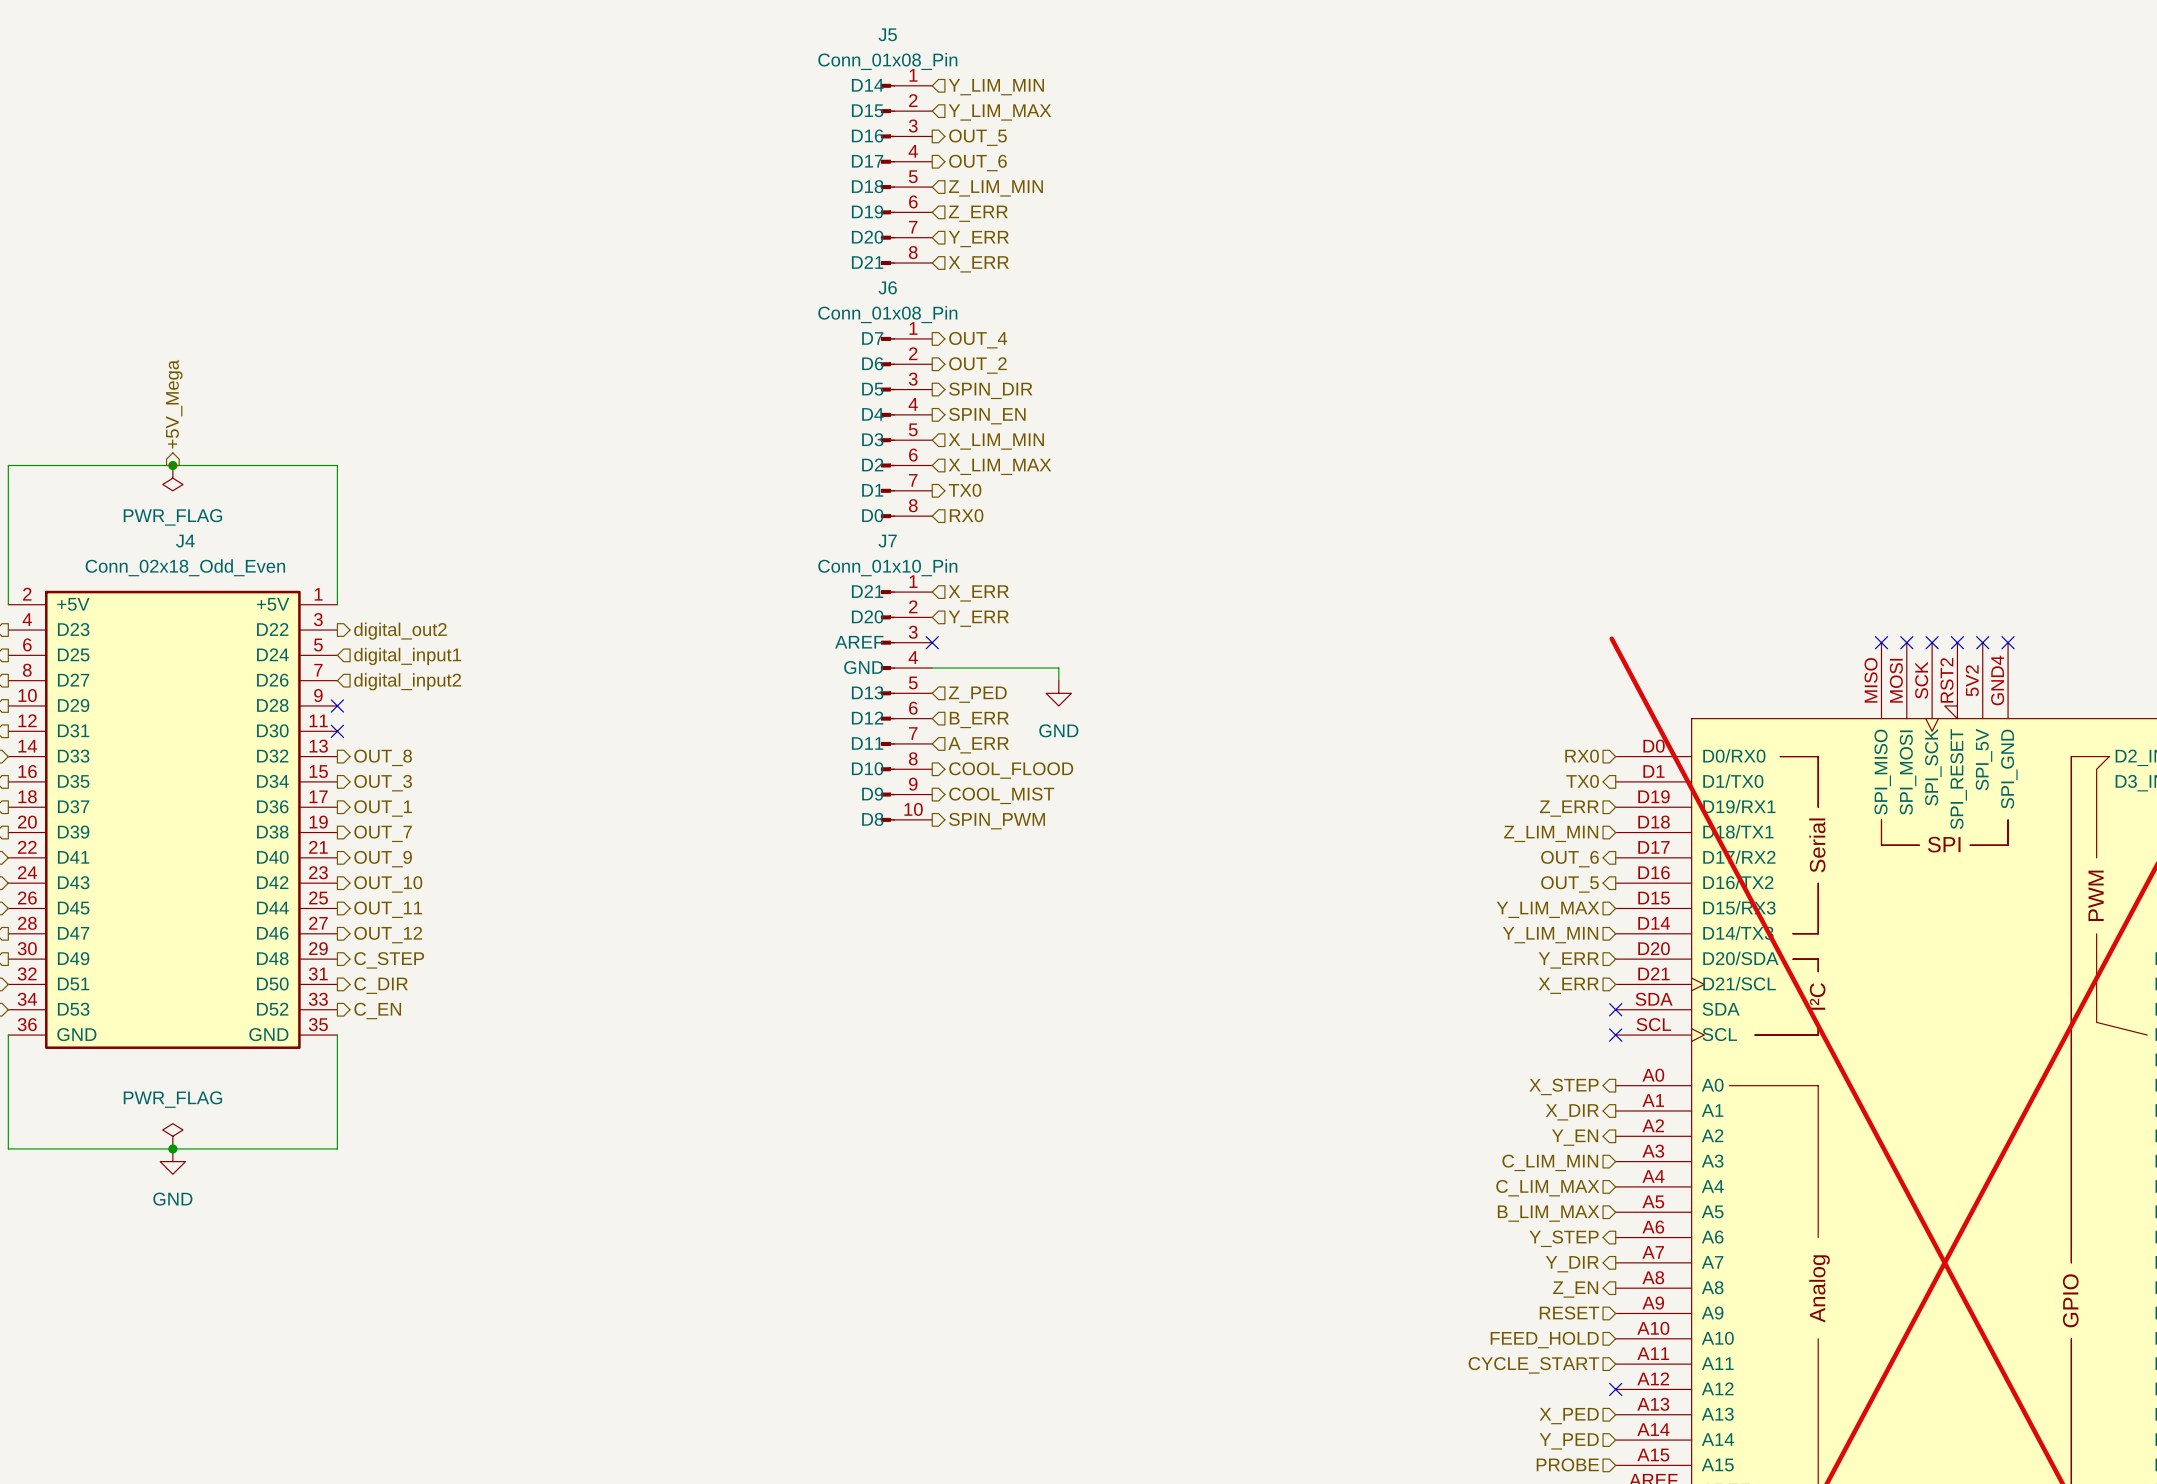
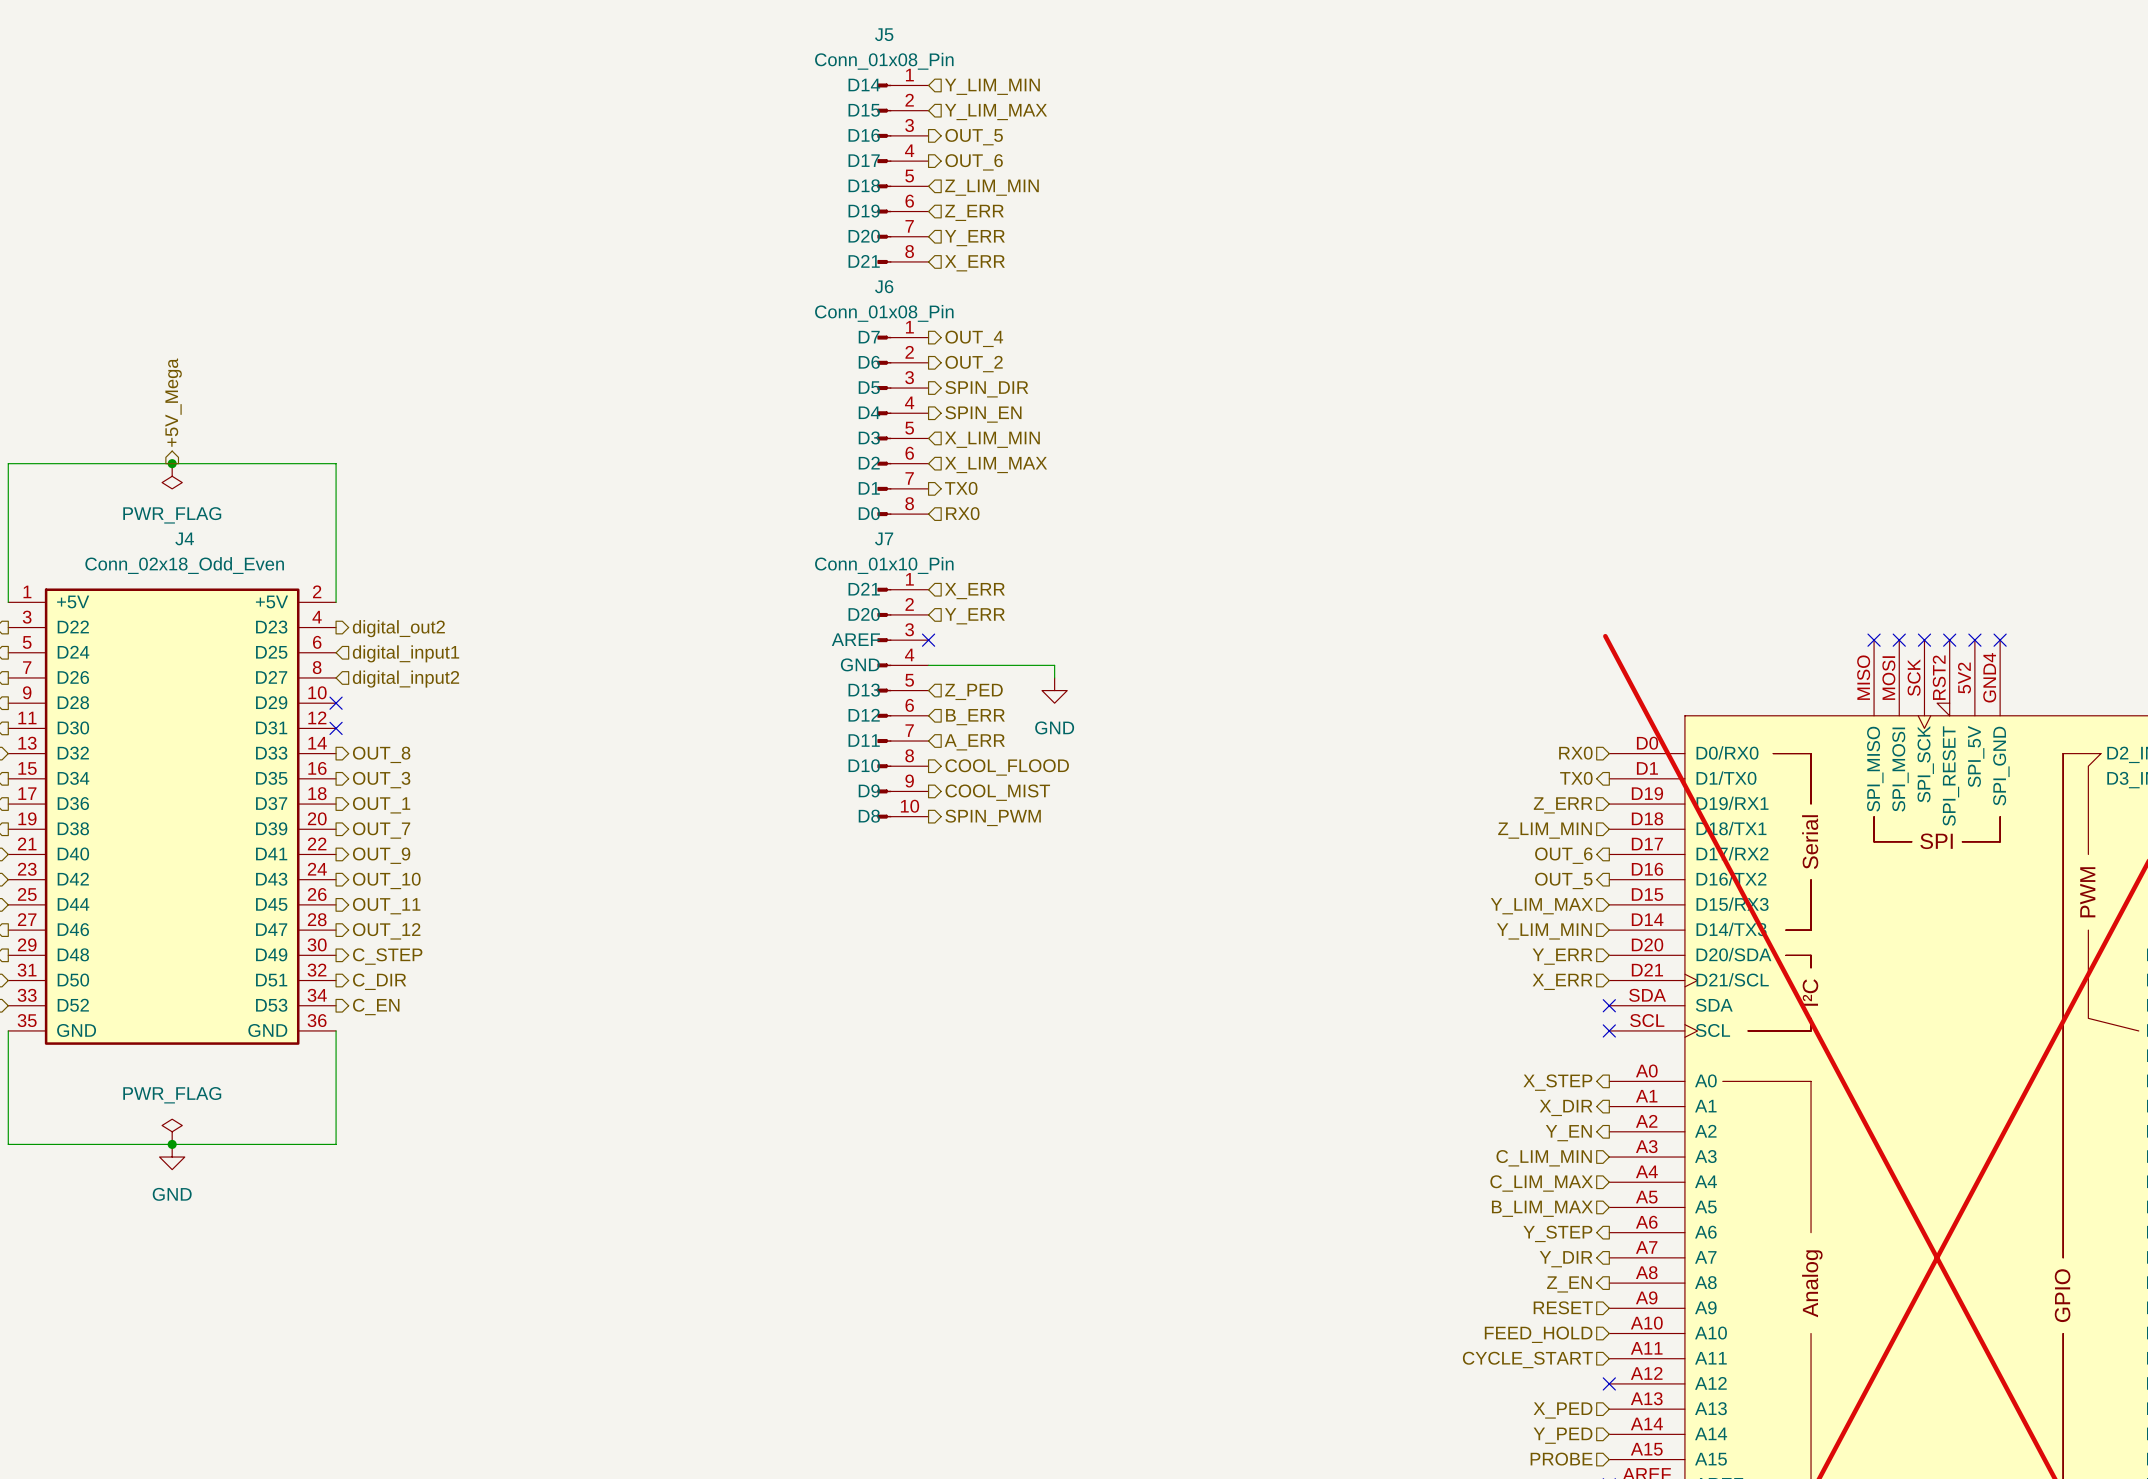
J4 flip: as is (172, 819) -> left-right (172, 816)

